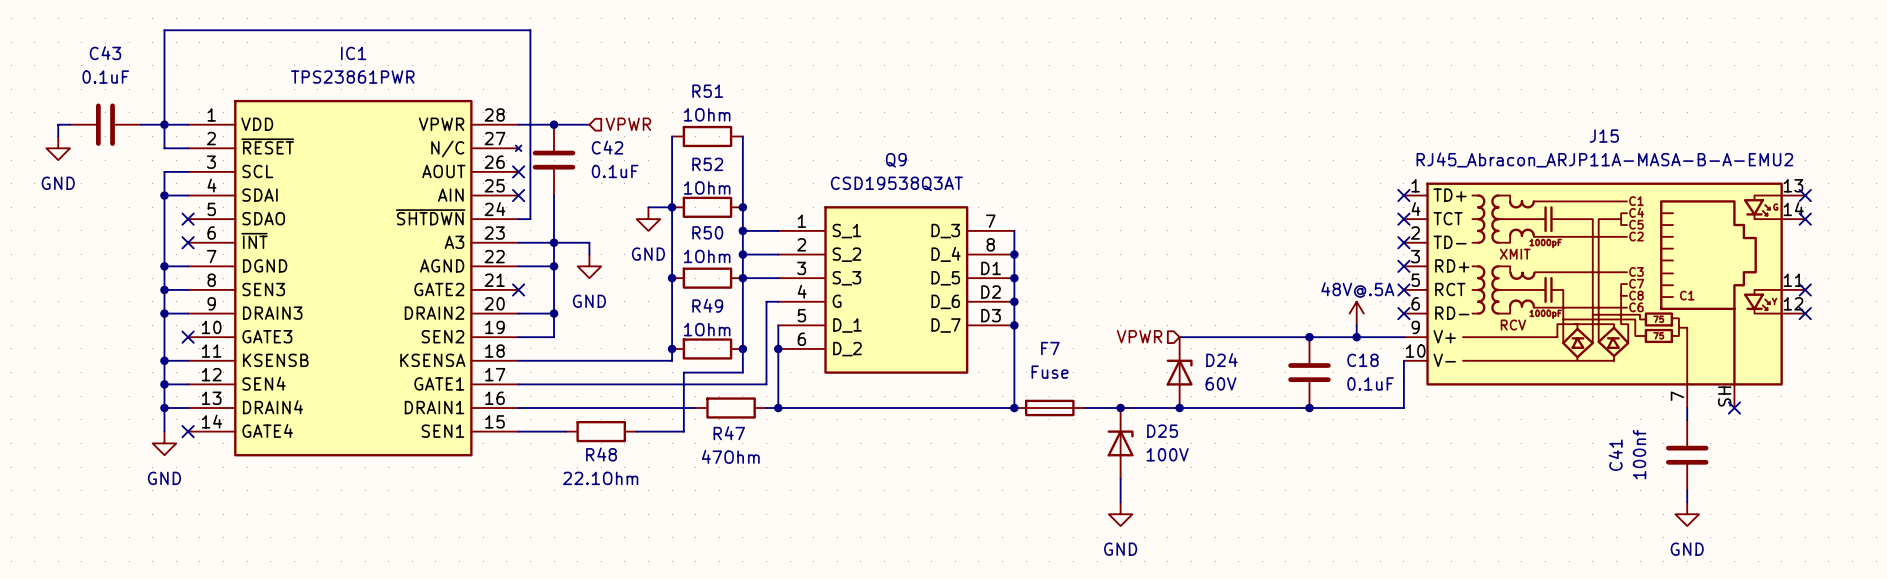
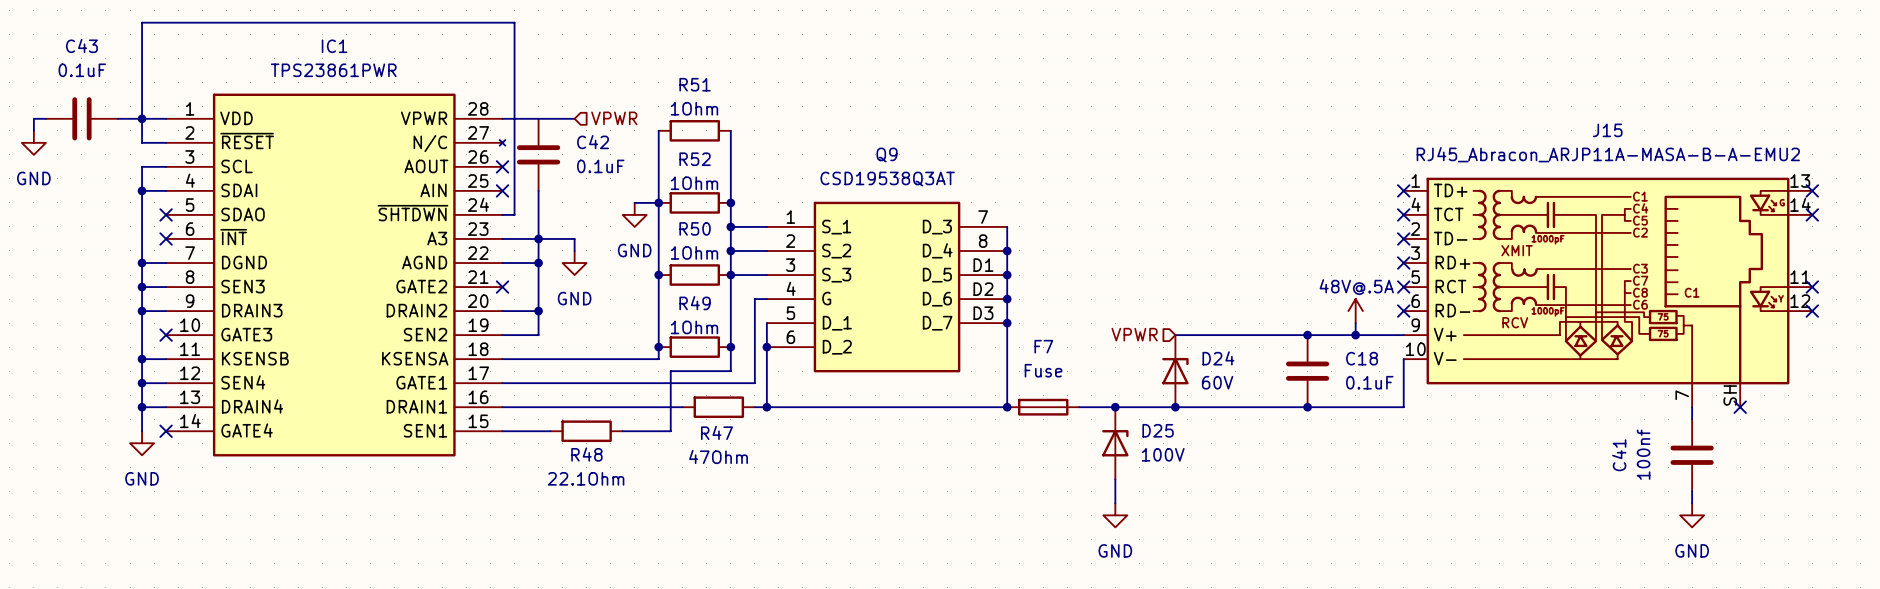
junction: (554, 124) -> none

